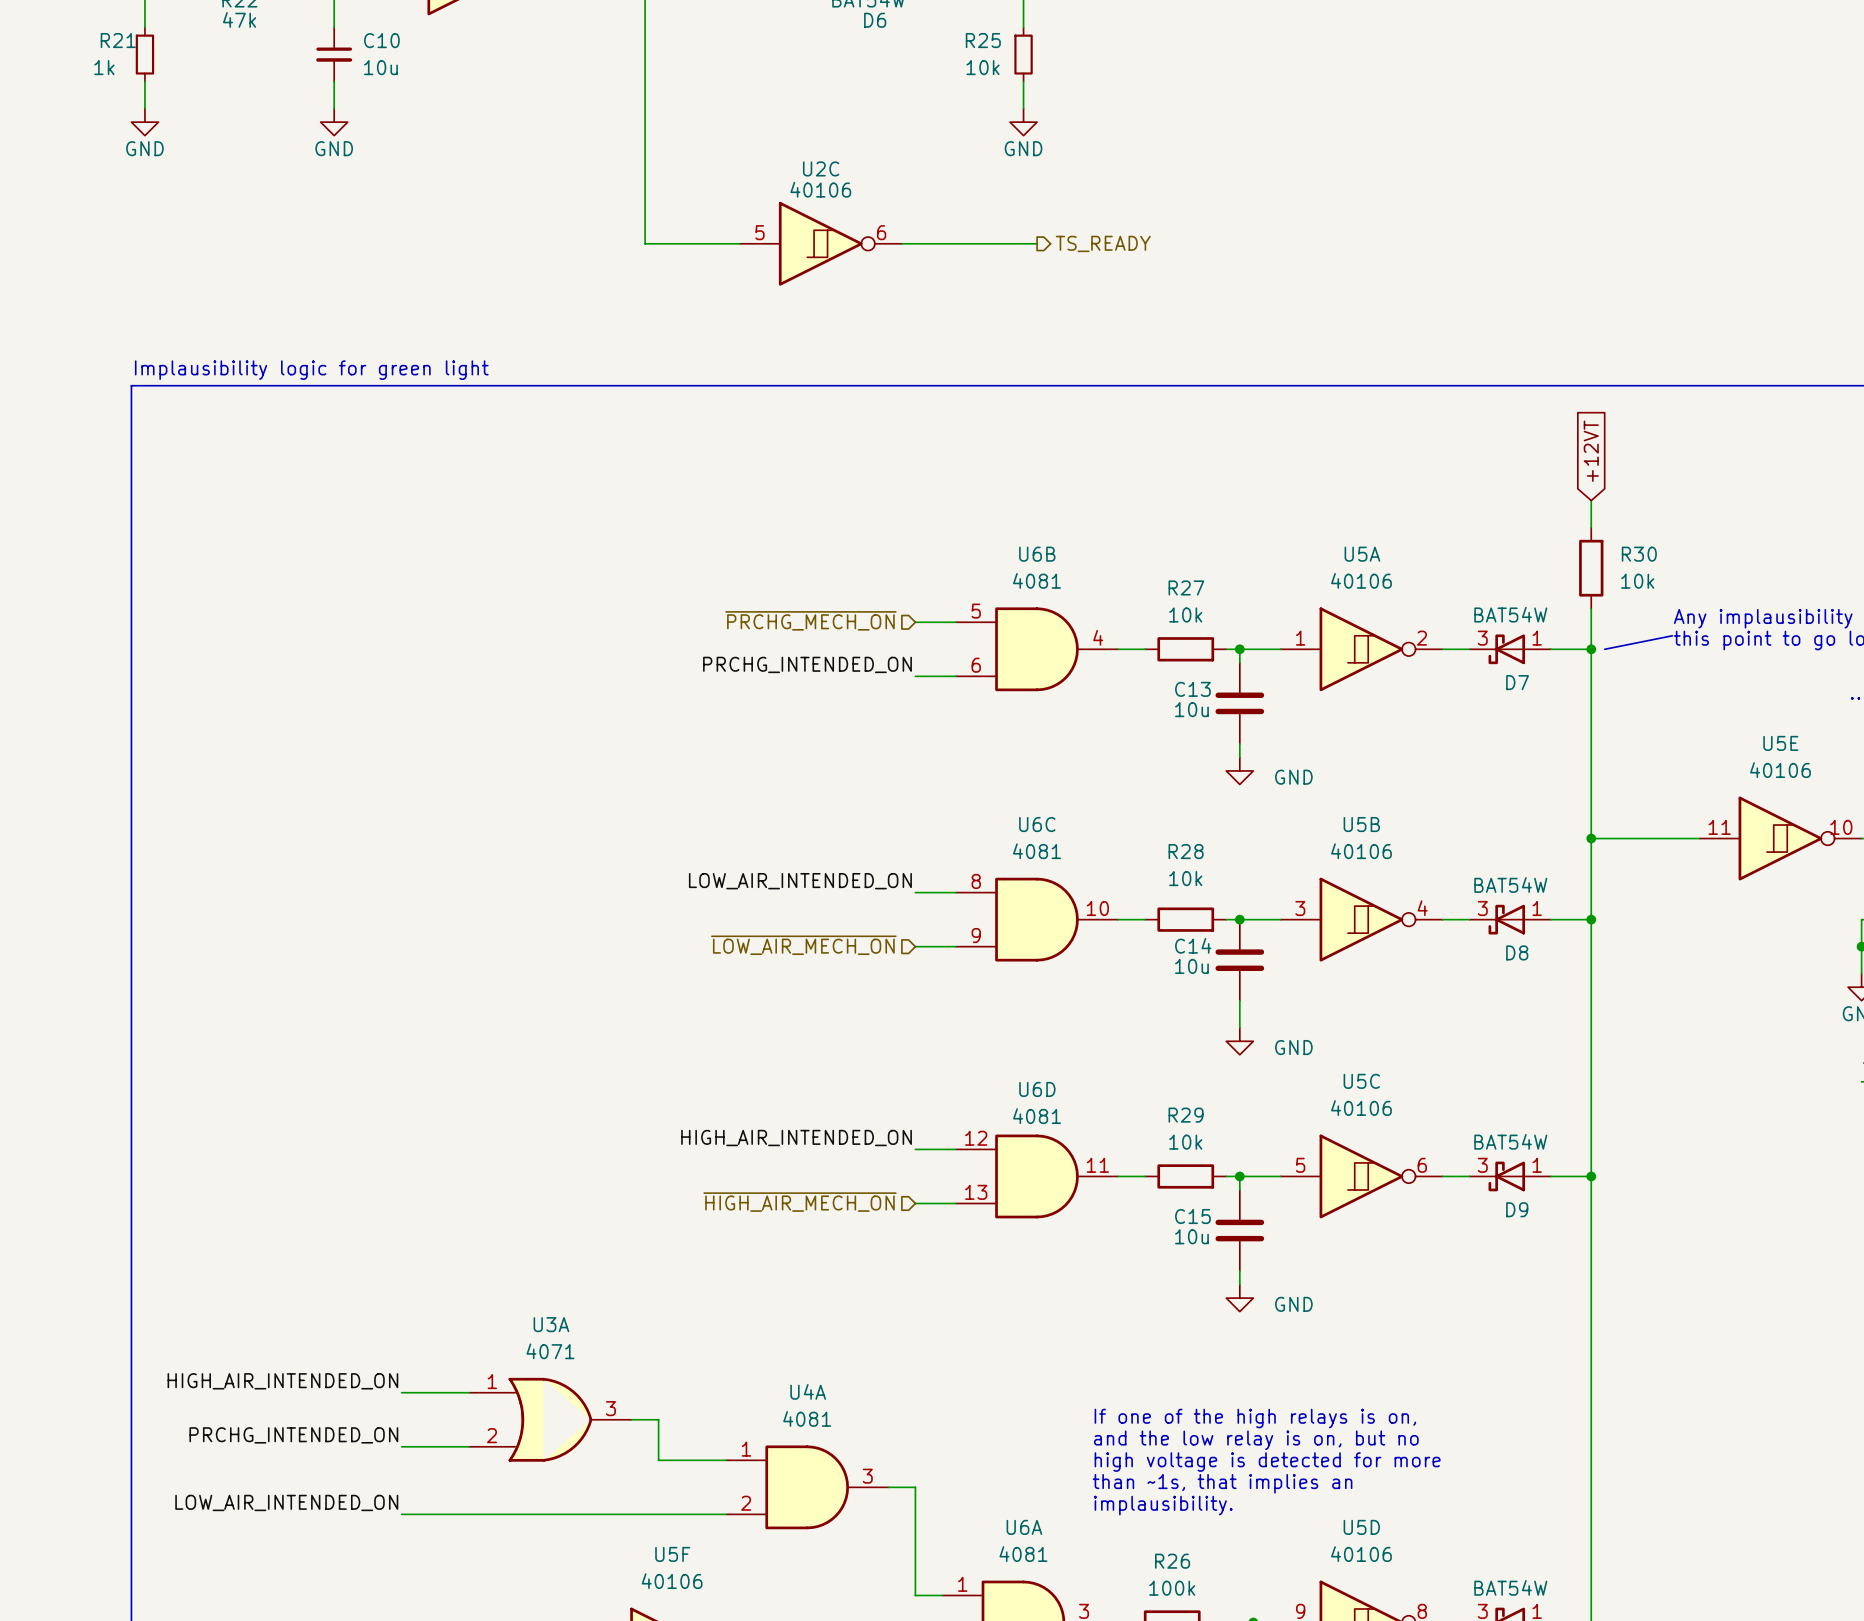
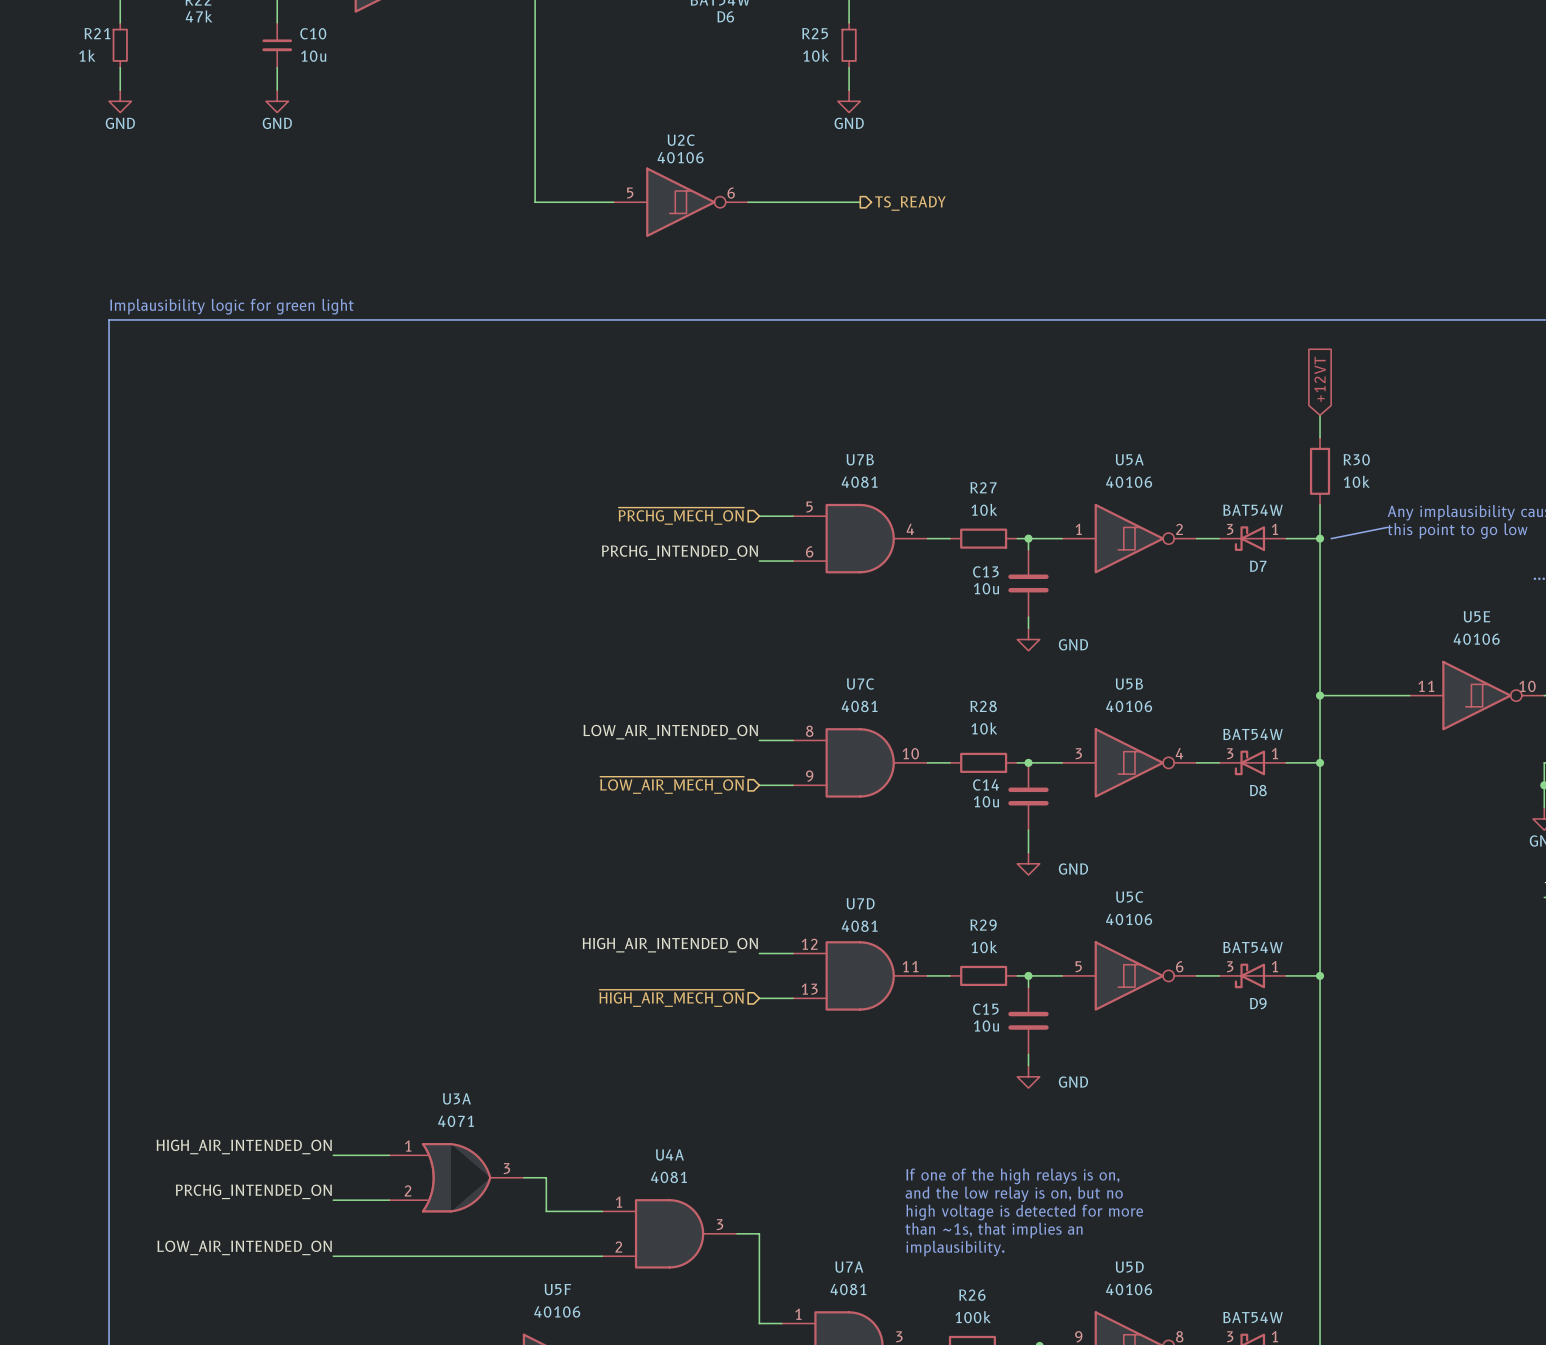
U6B name: U6B (1037, 554) -> U7B (860, 459)
U6C name: U6C (1037, 824) -> U7C (860, 684)
U6D name: U6D (1037, 1089) -> U7D (860, 903)
U6A name: U6A (1024, 1527) -> U7A (849, 1267)

